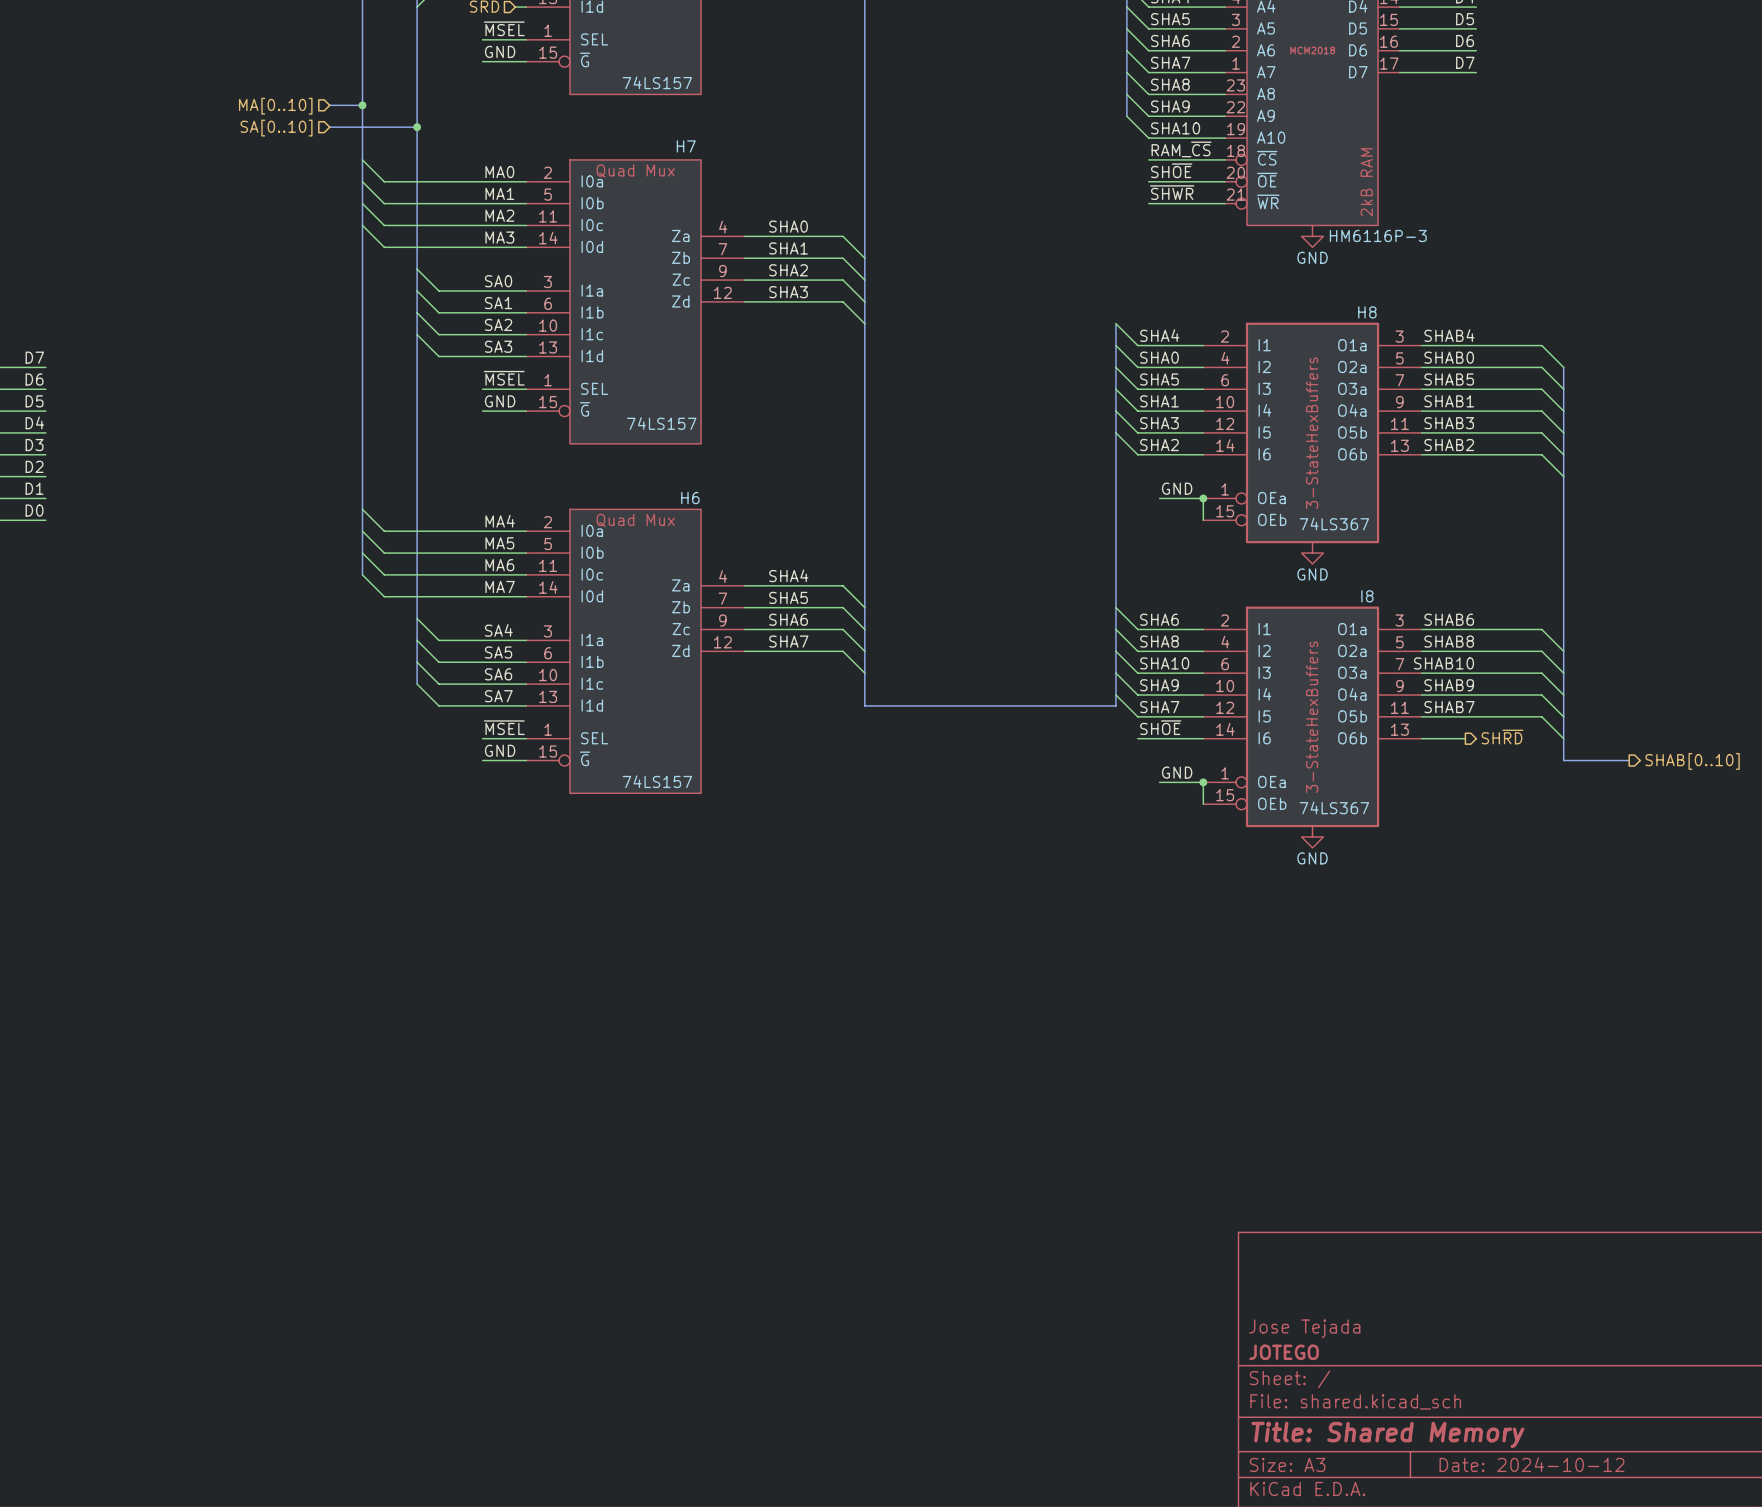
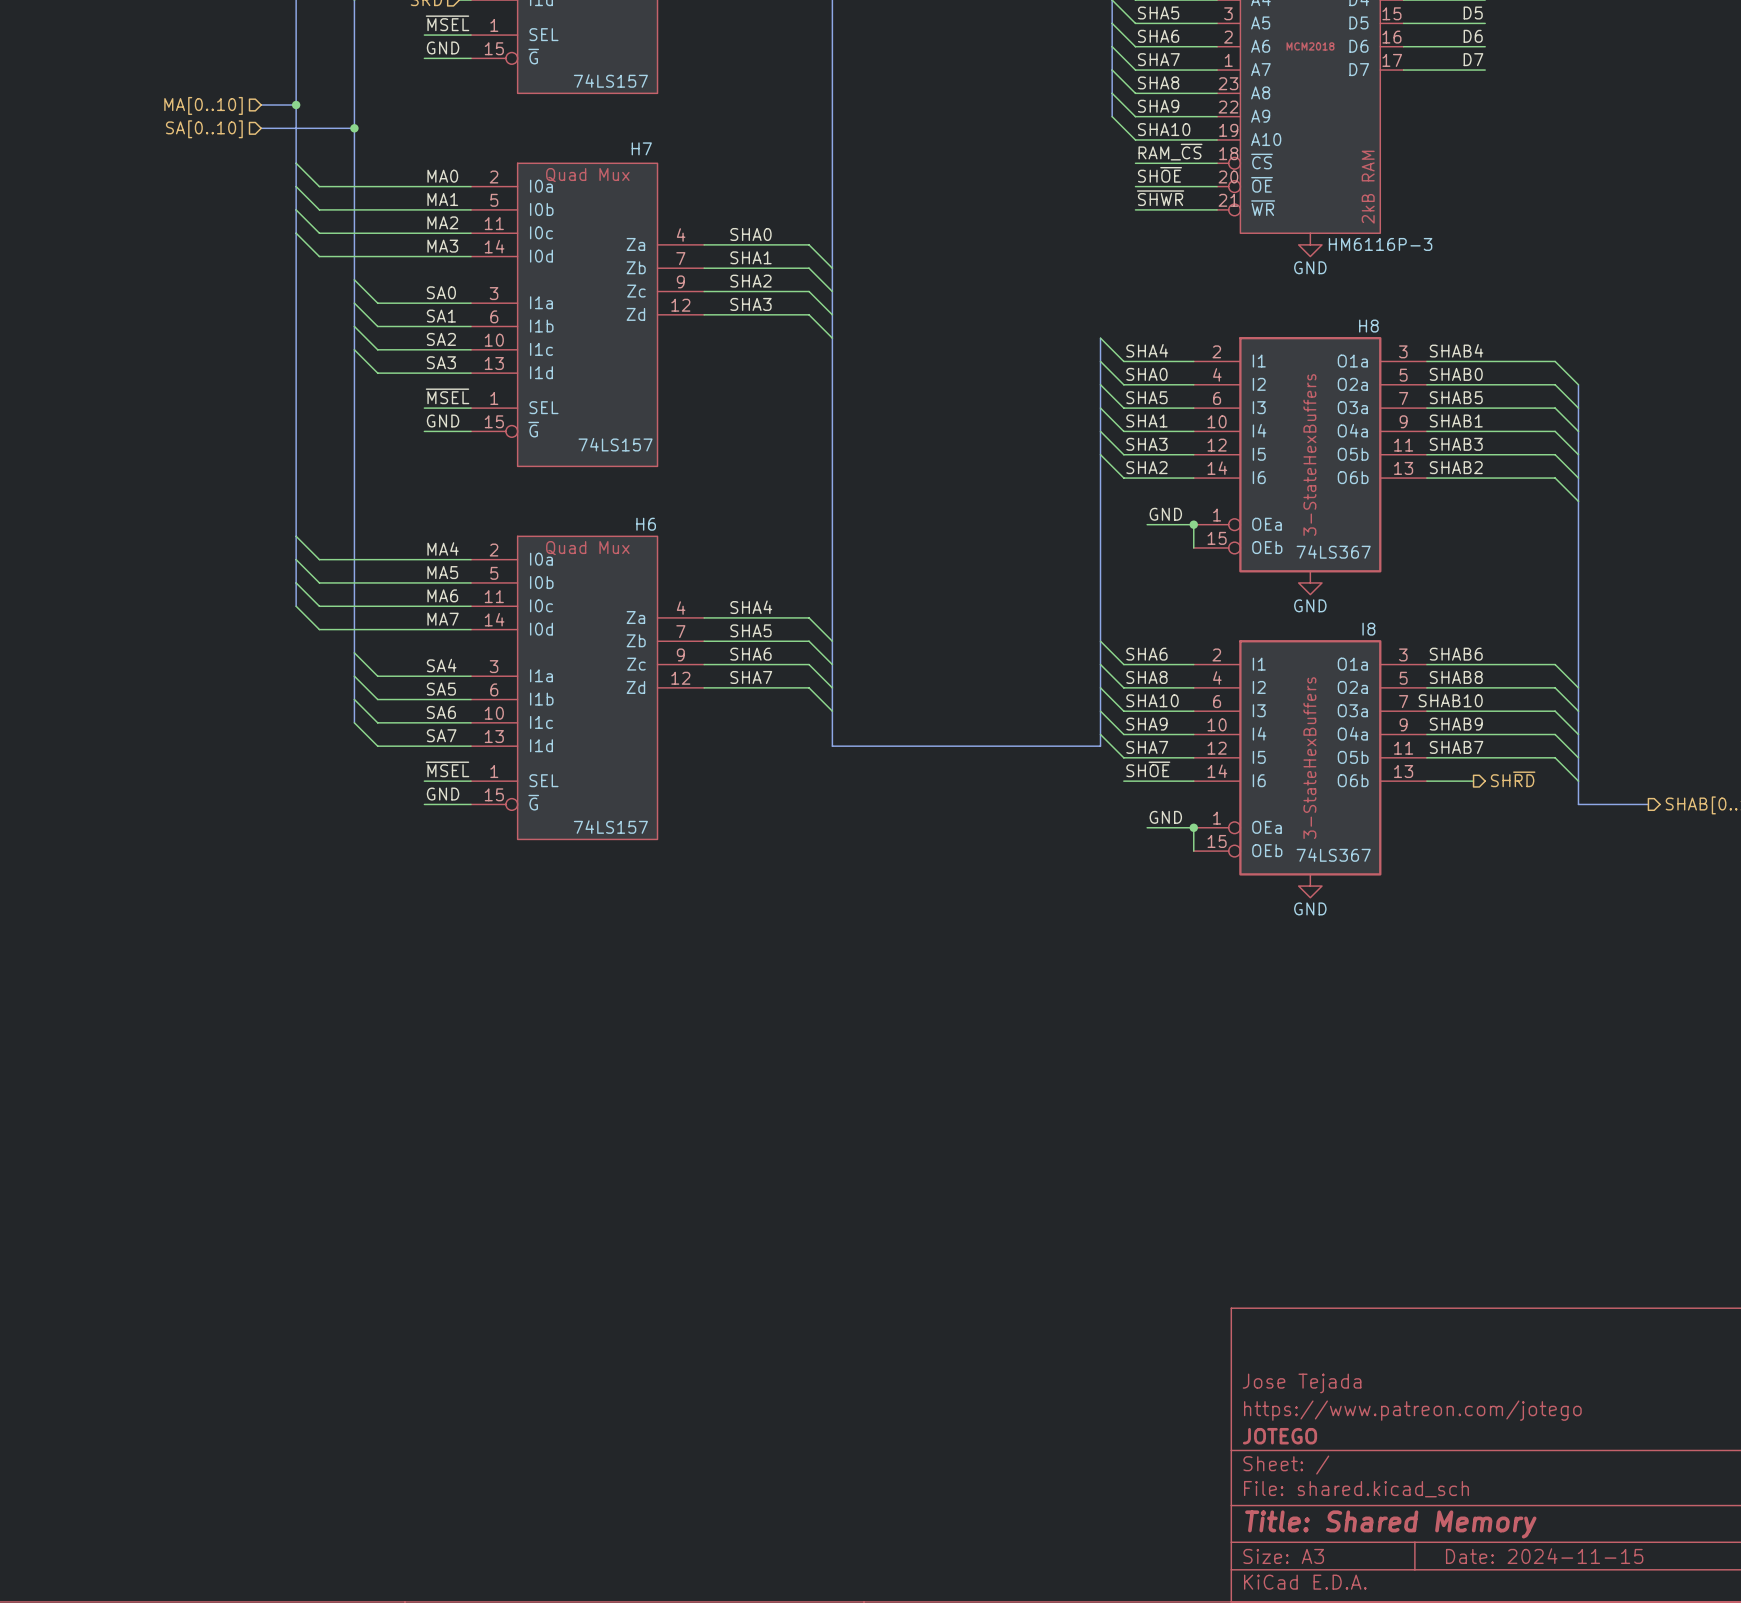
title block: none -> Jose Tejada (1302, 1383)
title block: Jose Tejada (1304, 1328) -> https://www.patreon.com/jotego (1412, 1410)
title block: Date: 2024-10-12 (1532, 1464) -> Date: 2024-11-15 (1544, 1556)

